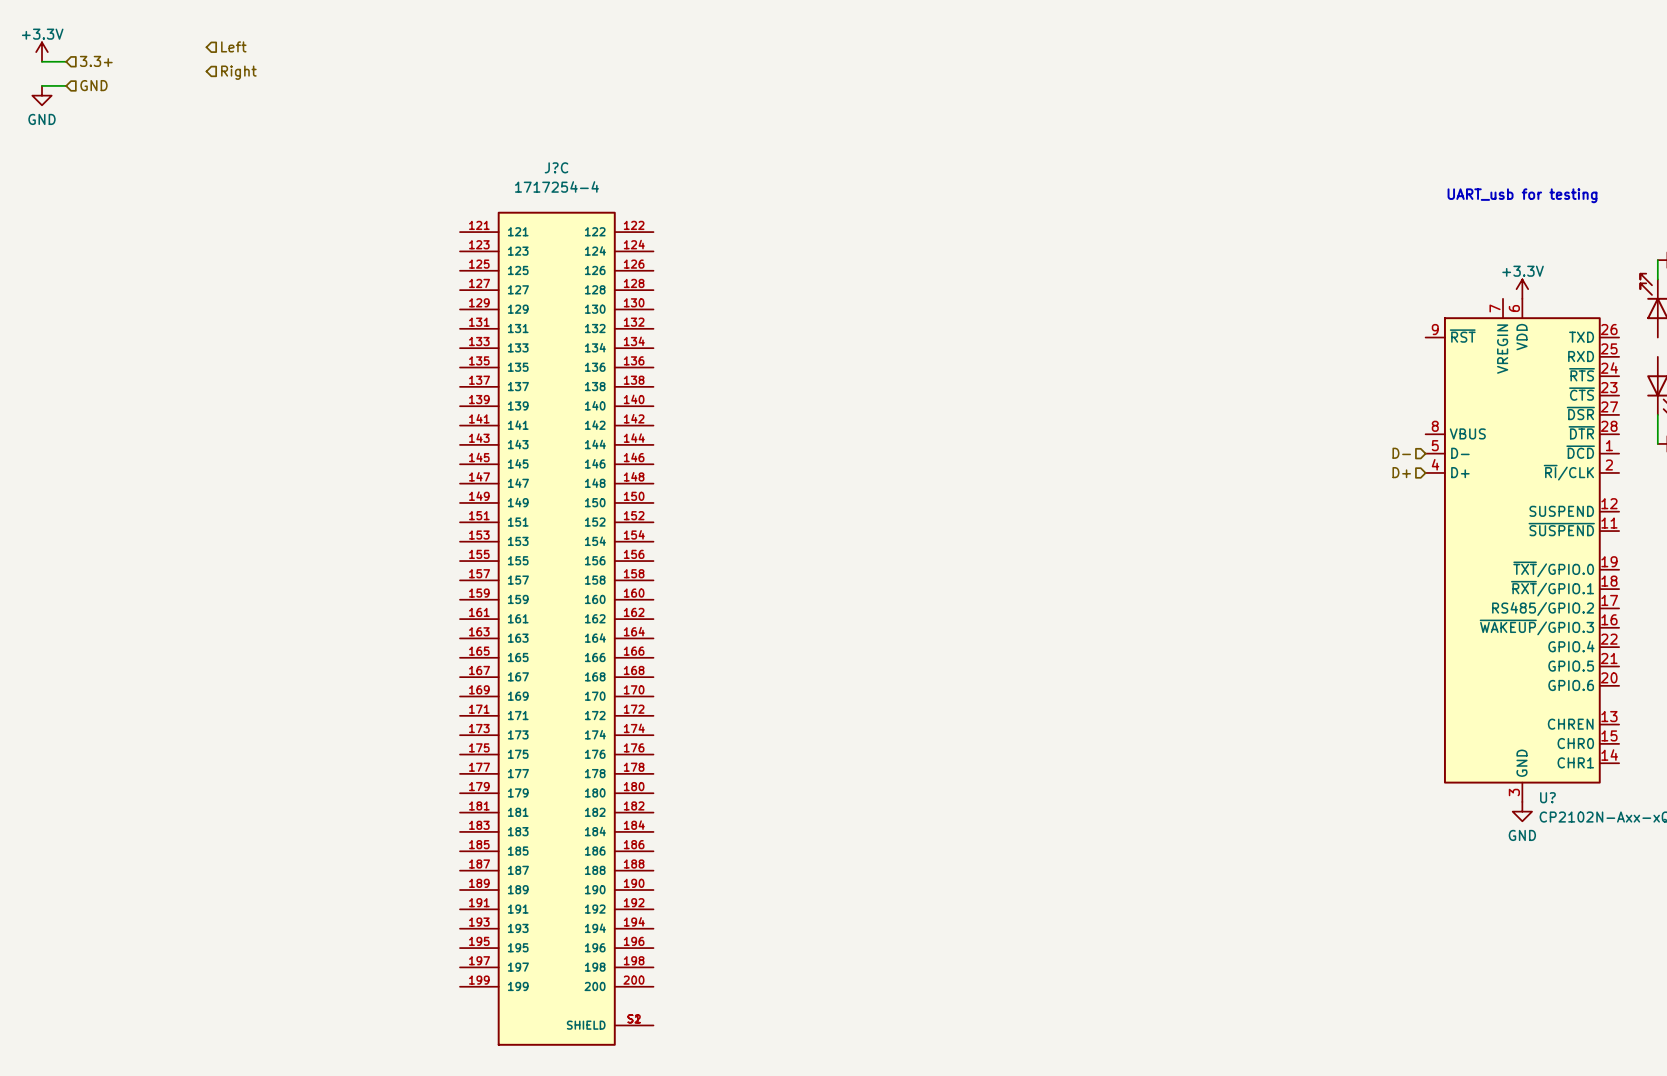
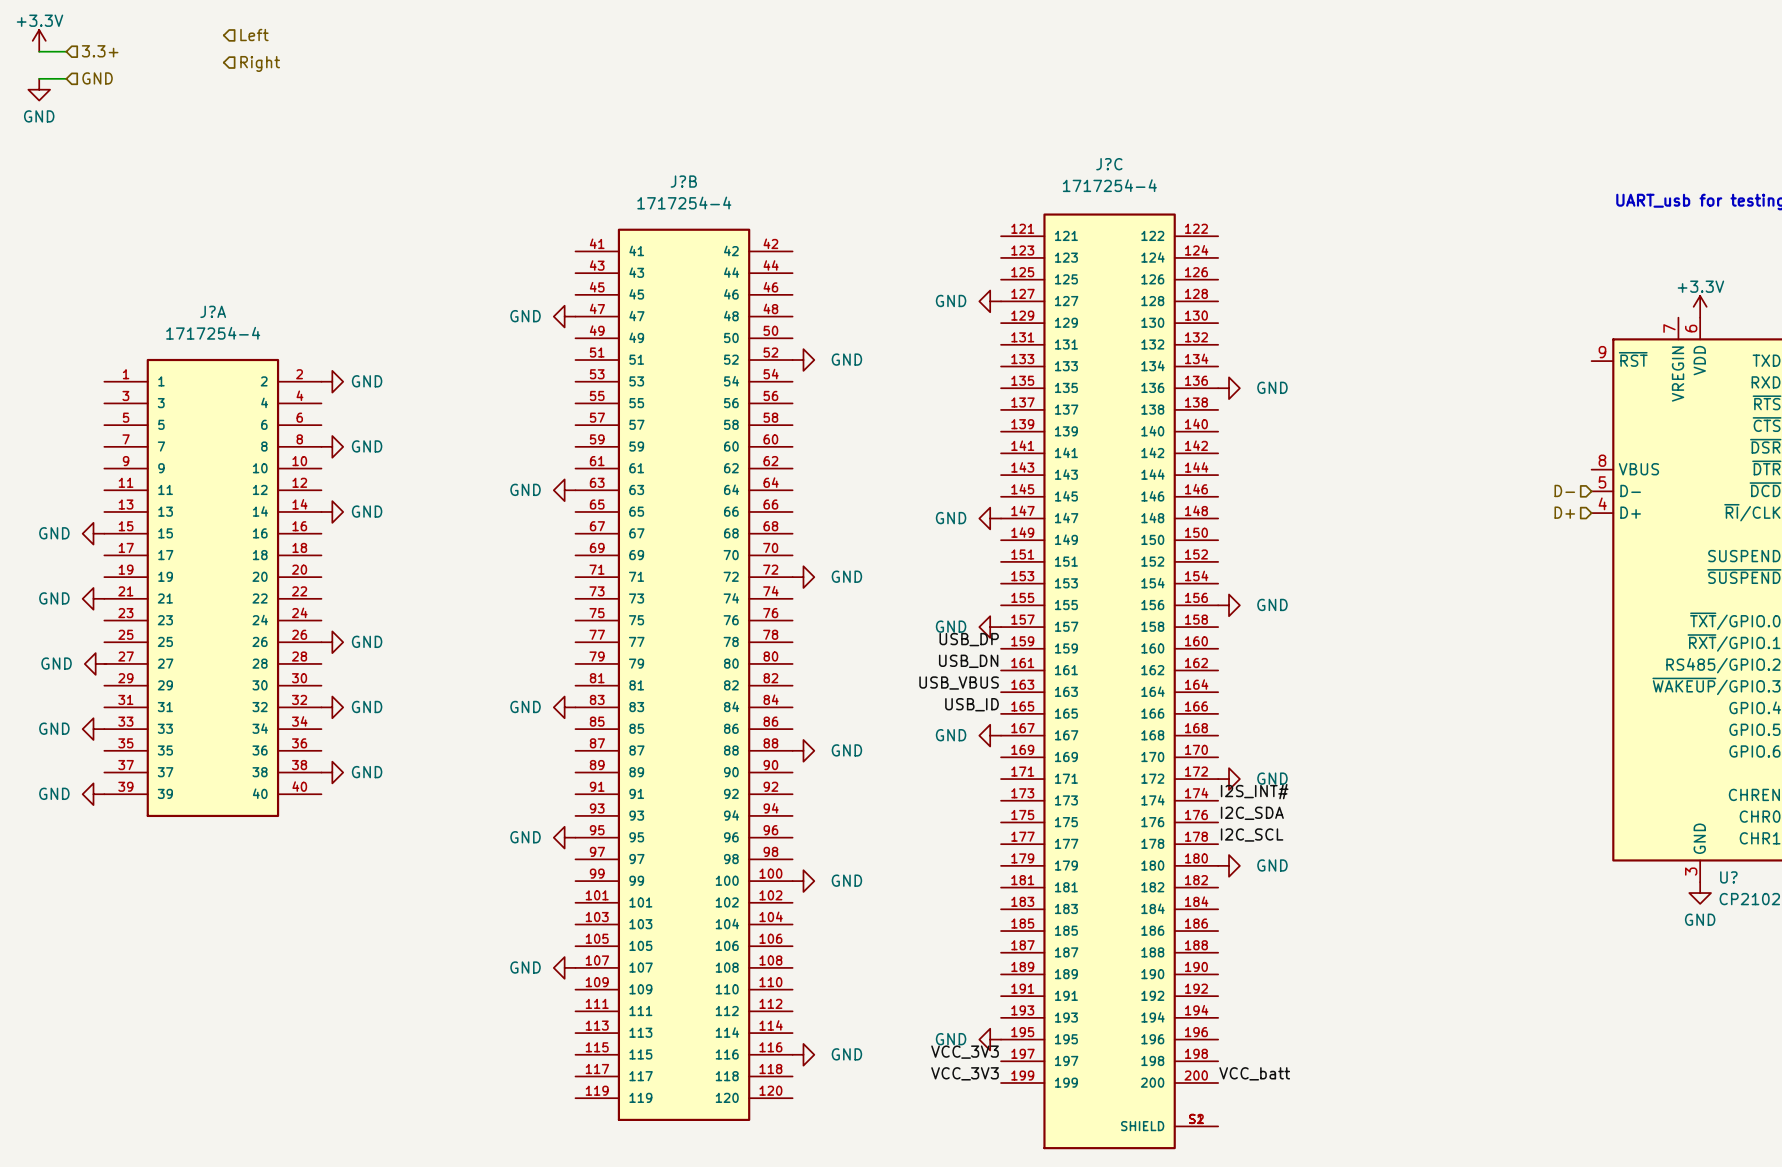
power symbol: none -> GND (990, 301)
power symbol: none -> GND (564, 316)
power symbol: none -> GND (803, 360)
power symbol: none -> GND (332, 381)
power symbol: none -> GND (1229, 388)
power symbol: none -> GND (332, 446)
power symbol: none -> GND (564, 490)
power symbol: none -> GND (332, 511)
power symbol: none -> GND (990, 518)
power symbol: none -> GND (93, 533)
power symbol: none -> GND (803, 577)
J?A: none -> 1717254-4 (212, 587)
power symbol: none -> GND (93, 598)
power symbol: none -> GND (1229, 605)
power symbol: none -> GND (990, 627)
label: none -> USB_DP (969, 639)
power symbol: none -> GND (332, 642)
label: none -> USB_DN (968, 661)
power symbol: none -> GND (95, 663)
J?B: none -> 1717254-4 (684, 674)
J?C: none -> 1717254-4 (1109, 681)
label: none -> USB_VBUS (959, 683)
J?C: 1717254-4 (556, 628) -> none
label: none -> USB_ID (972, 704)
power symbol: none -> GND (332, 707)
power symbol: none -> GND (564, 707)
power symbol: none -> GND (93, 729)
power symbol: none -> GND (990, 735)
power symbol: none -> GND (803, 750)
power symbol: none -> GND (332, 772)
power symbol: none -> GND (1229, 779)
label: none -> I2S_INT# (1254, 791)
power symbol: none -> GND (93, 794)
label: none -> I2C_SDA (1252, 813)
label: none -> I2C_SCL (1252, 835)
power symbol: none -> GND (564, 837)
power symbol: none -> GND (1229, 865)
power symbol: none -> GND (803, 881)
power symbol: none -> GND (564, 967)
power symbol: none -> GND (990, 1039)
label: none -> VCC_3V3 (965, 1052)
power symbol: none -> GND (803, 1054)
label: none -> VCC_3V3 (965, 1073)
label: none -> VCC_batt (1254, 1073)

